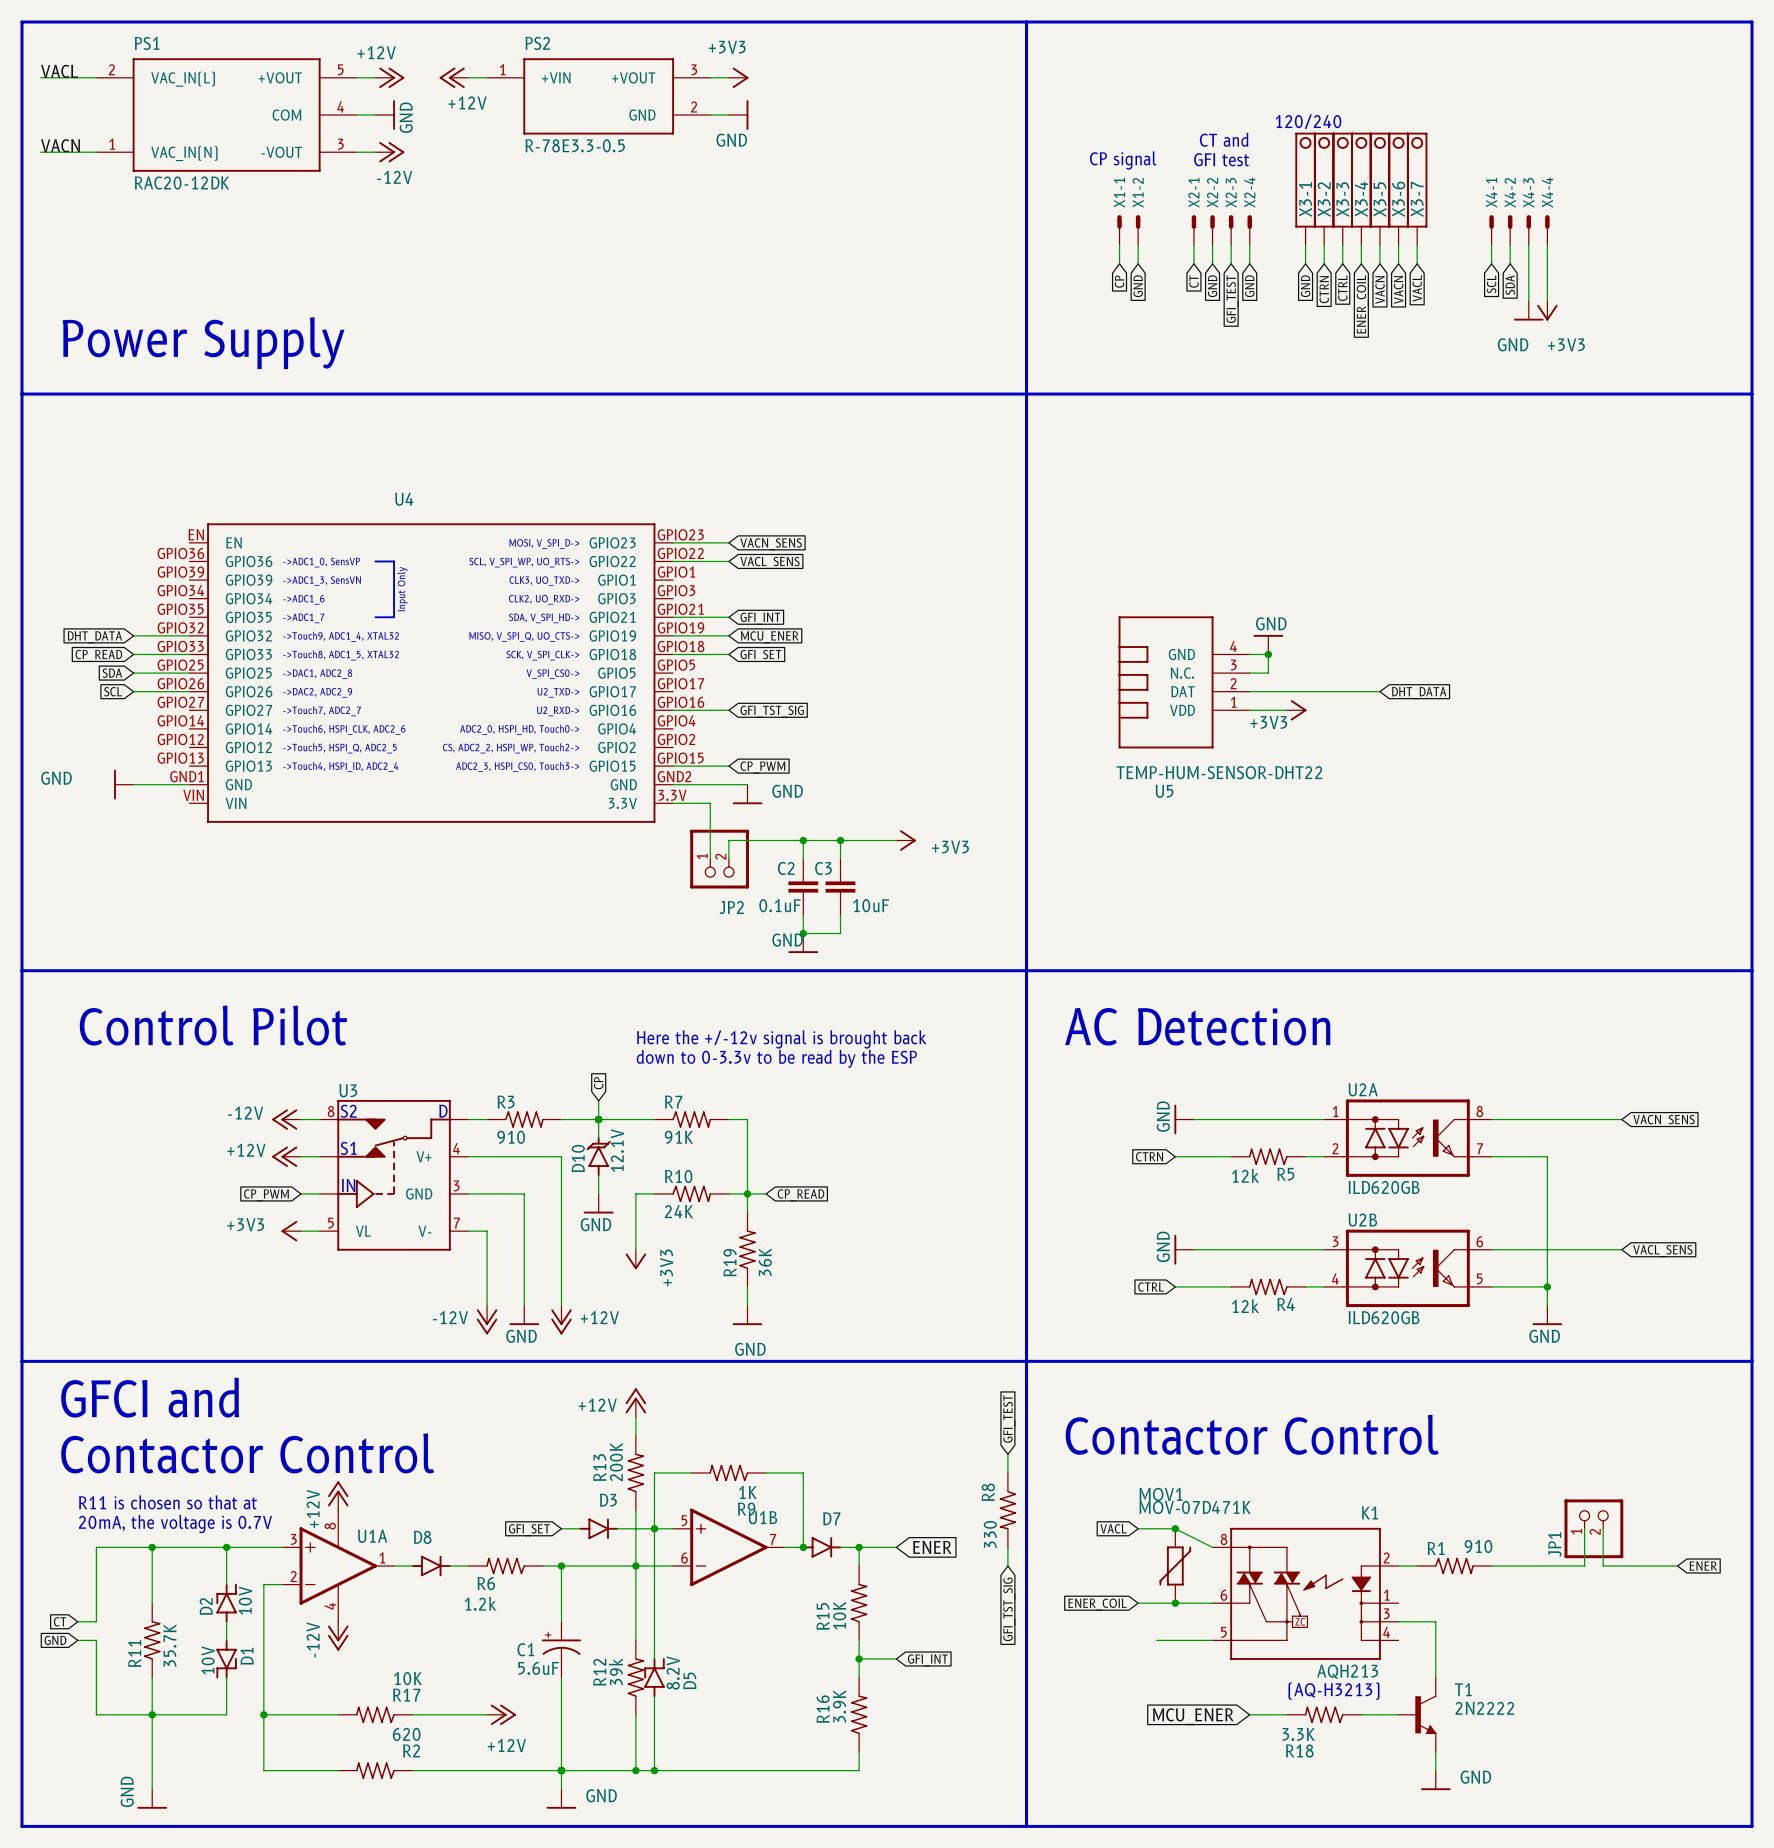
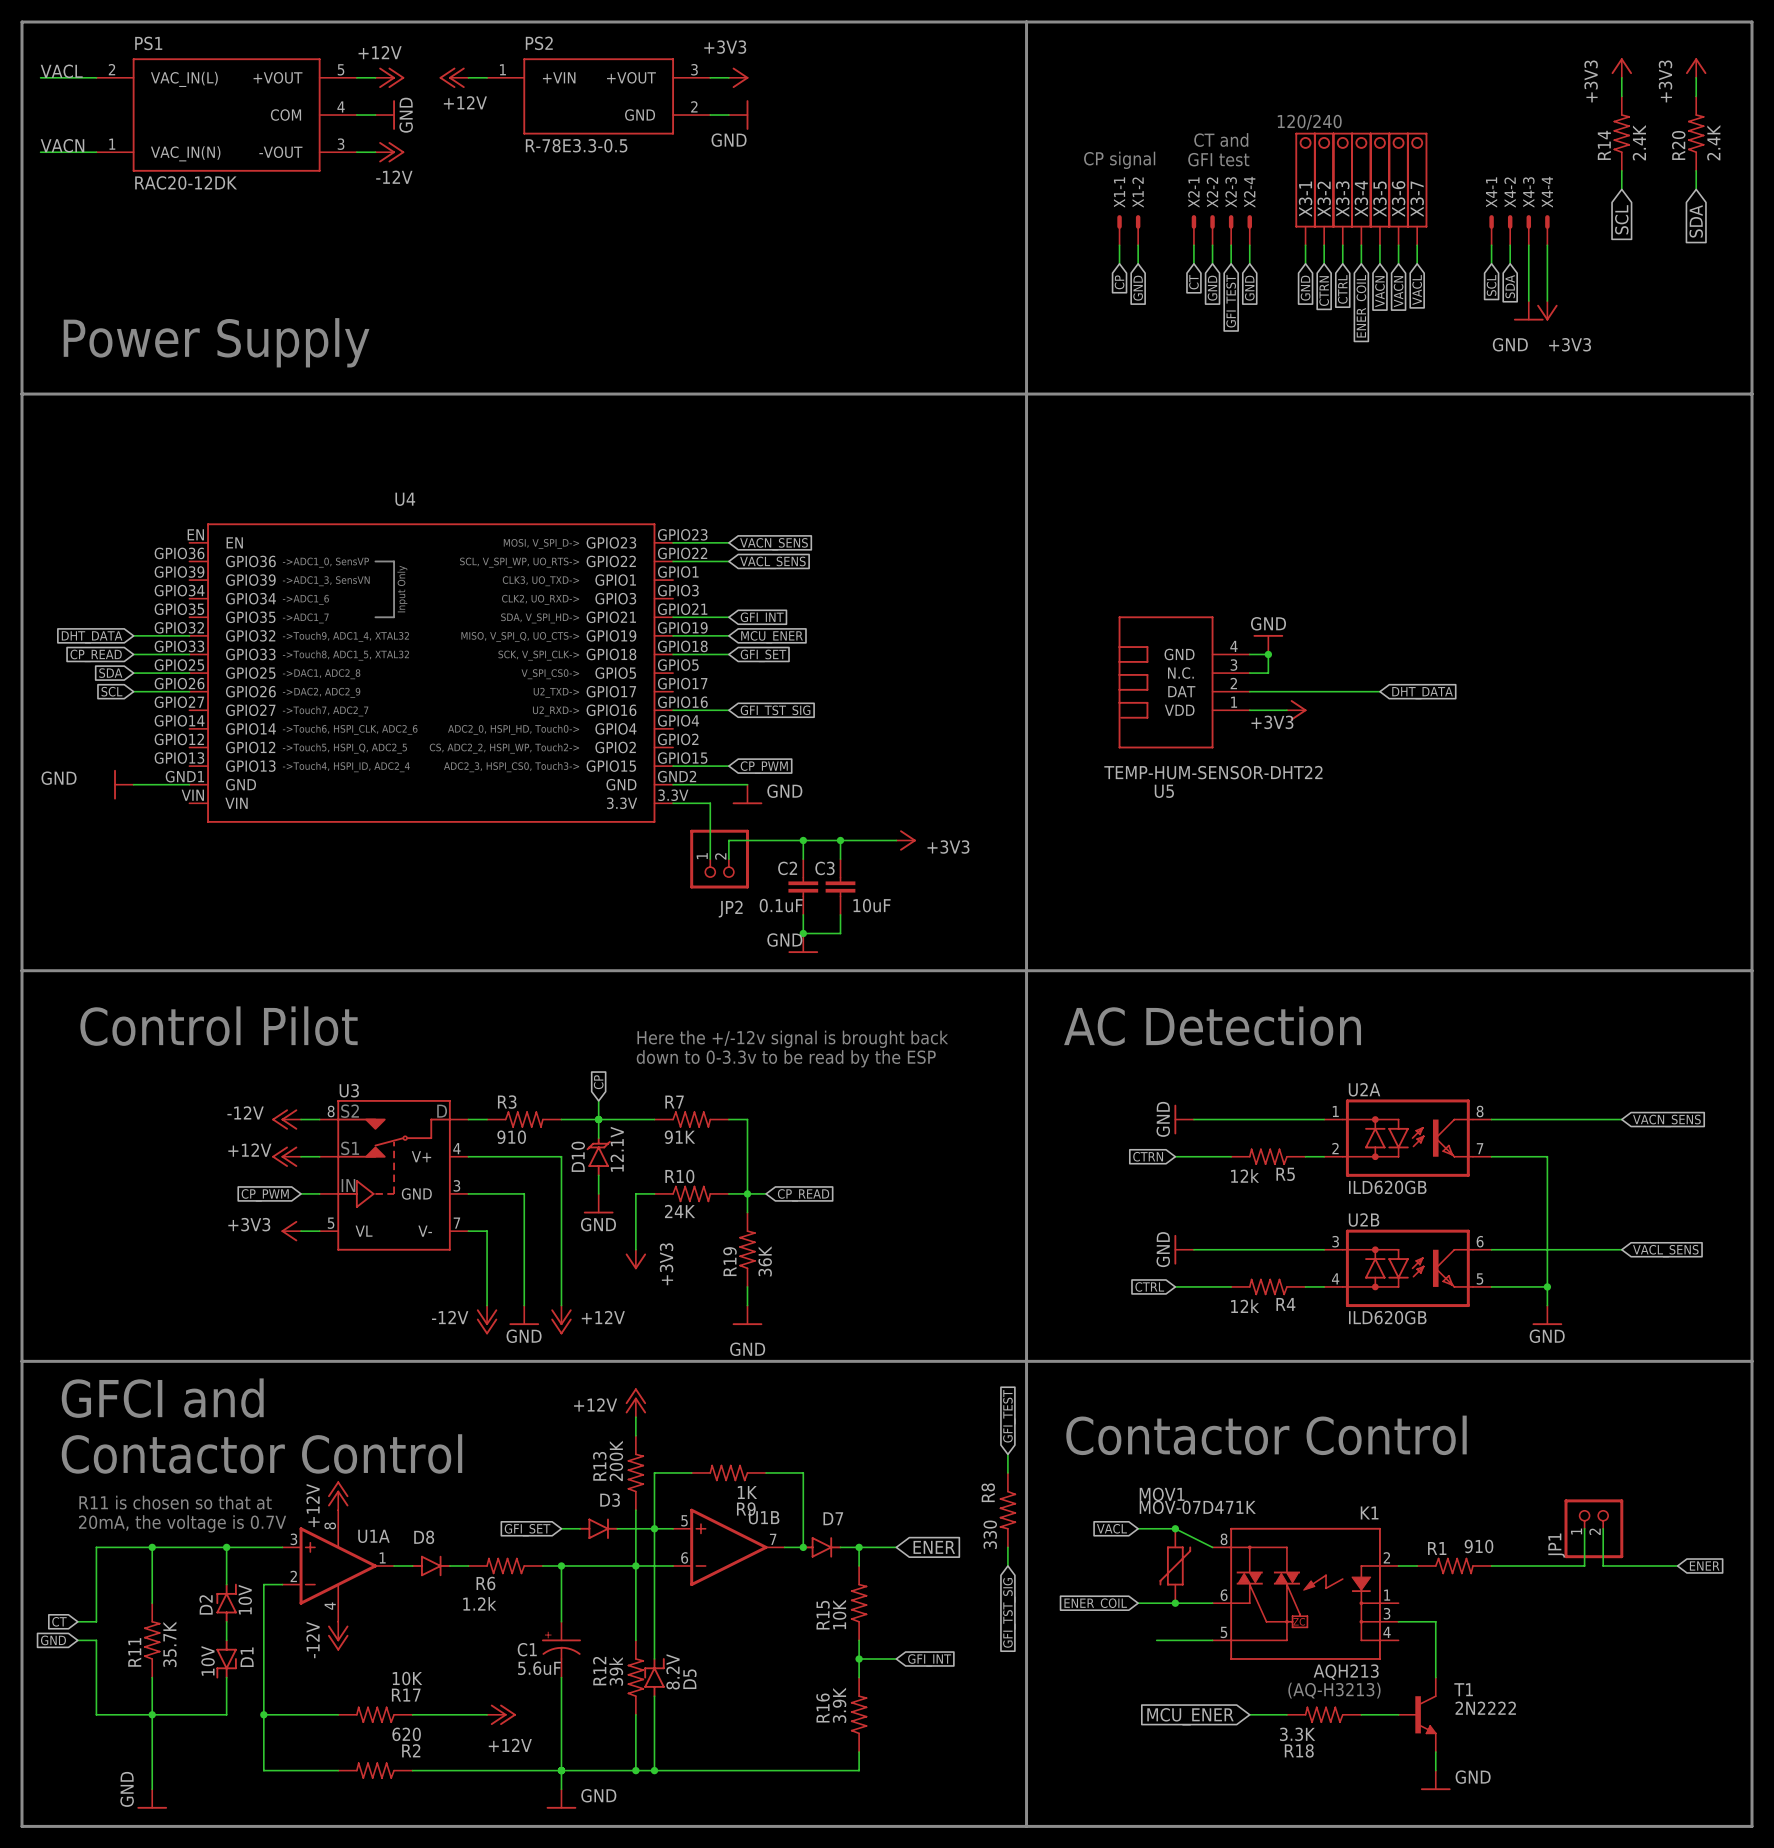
power symbol: none -> +3V3 (1621, 68)
power symbol: none -> +3V3 (1696, 68)
wire: none -> (1621, 77) (1621, 96)
wire: none -> (1696, 77) (1696, 96)
R14: none -> 2.4K (1621, 133)
R20: none -> 2.4K (1696, 133)
wire: none -> (1621, 170) (1621, 189)
wire: none -> (1696, 170) (1696, 189)
global label: none -> SCL (1621, 219)
global label: none -> SDA (1696, 221)

